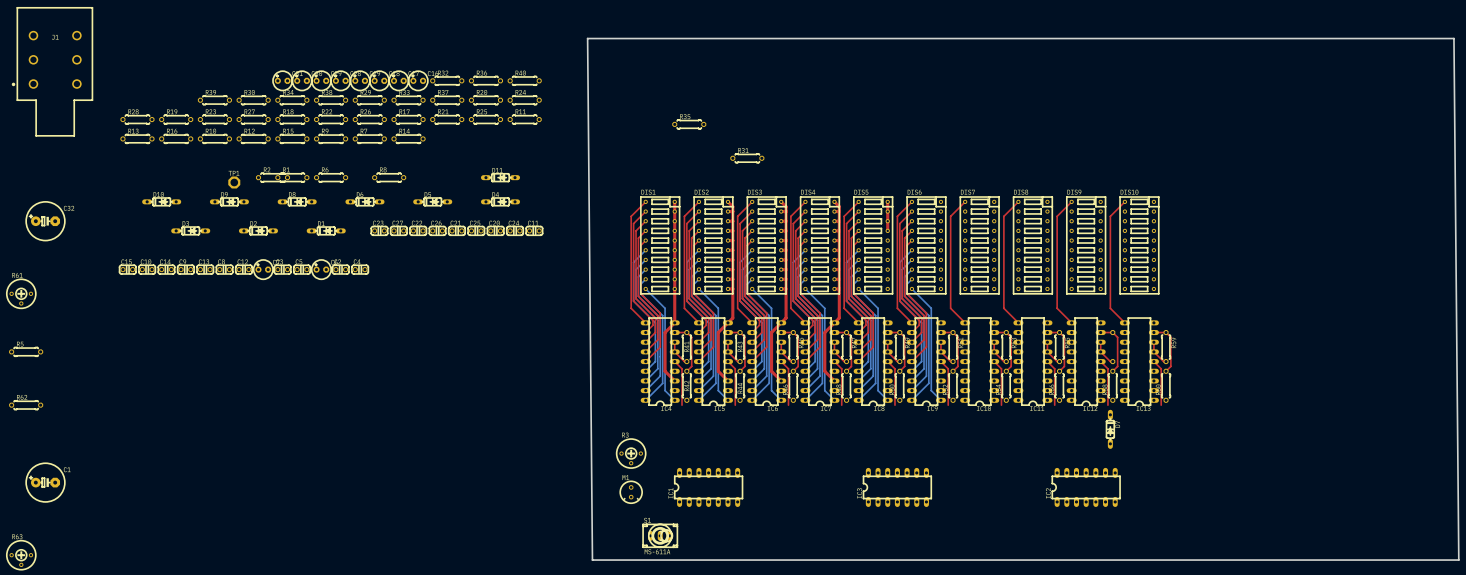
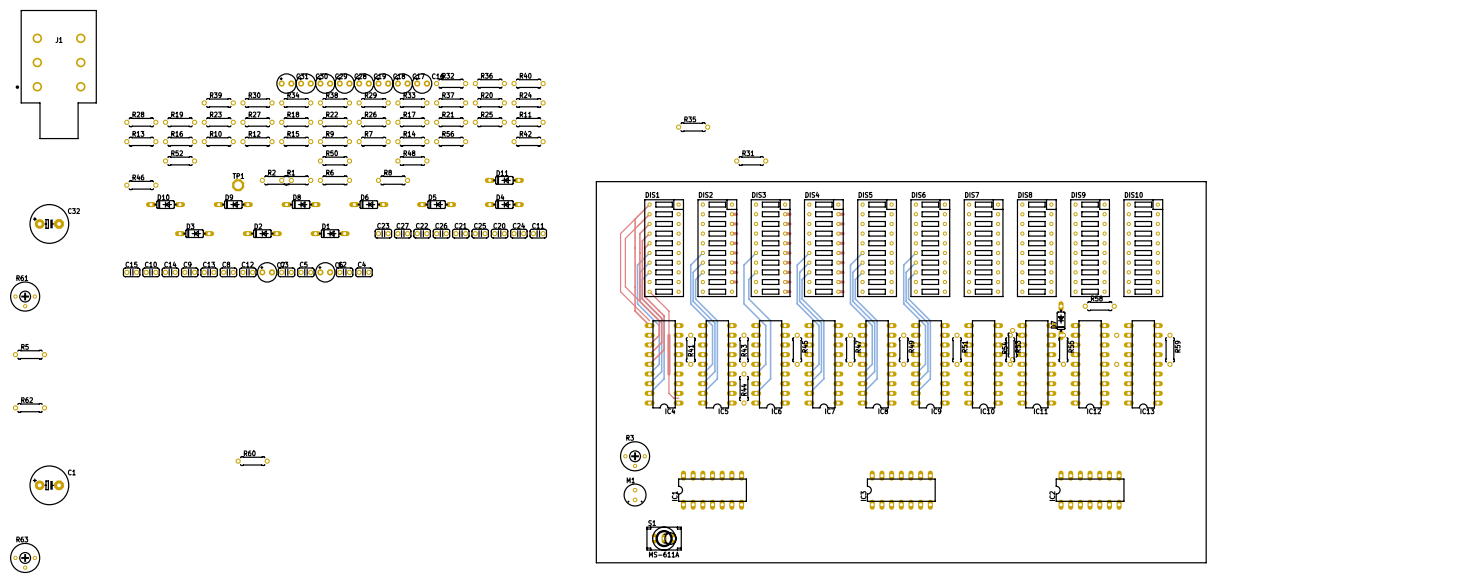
top track: (674, 201) (674, 322) (665, 332) -> (649, 291) (668, 311) (668, 335)
top track: (698, 201) (684, 216) (684, 308) (698, 322) -> none
top track: (727, 201) (732, 206) (732, 318) (718, 332) (718, 371) (727, 380) -> none
top track: (752, 201) (737, 216) (737, 308) (752, 322) -> none
top track: (781, 201) (786, 206) (786, 318) (771, 332) (771, 371) (781, 380) -> none
top track: (805, 201) (790, 216) (790, 308) (805, 322) -> none
top track: (834, 201) (839, 206) (839, 318) (824, 332) (824, 371) (834, 380) -> none
top track: (858, 201) (844, 216) (844, 308) (858, 322) -> none
top track: (887, 201) (887, 230) -> none
top track: (911, 201) (897, 216) (897, 308) (911, 322) -> none
top track: (965, 201) (950, 216) (950, 308) (965, 322) -> none
top track: (1018, 201) (1003, 216) (1003, 308) (1018, 322) -> none
top track: (1071, 201) (1057, 216) (1057, 308) (1071, 322) -> none
top track: (1124, 201) (1110, 216) (1110, 308) (1124, 322) -> none
top track: (698, 211) (686, 223) (686, 301) (706, 320) (706, 325) (698, 332) -> none
top track: (752, 211) (740, 223) (740, 301) (759, 320) (759, 325) (752, 332) -> none
top track: (805, 211) (793, 223) (793, 301) (812, 320) (812, 325) (805, 332) -> none
top track: (858, 211) (846, 223) (846, 301) (865, 320) (865, 325) (858, 332) -> none
top track: (911, 211) (899, 223) (899, 301) (919, 320) (919, 325) (911, 332) -> none
top track: none -> (635, 219) (620, 233) (620, 291) (649, 320)
top track: (698, 221) (689, 230) (689, 298) (708, 318) (708, 332) (698, 342) -> none
top track: (752, 221) (742, 230) (742, 298) (761, 318) (761, 332) (752, 342) -> none
top track: (805, 221) (795, 230) (795, 298) (815, 318) (815, 332) (805, 342) -> none
top track: (858, 221) (848, 230) (848, 298) (868, 318) (868, 332) (858, 342) -> none
top track: (911, 221) (902, 230) (902, 298) (921, 318) (921, 332) (911, 342) -> none
top track: (633, 223) (633, 301) (652, 320) (652, 325) (645, 332) -> (637, 226) (625, 238) (625, 286) (639, 301)
top track: (698, 230) (691, 238) (691, 296) (711, 315) (711, 339) (698, 351) -> none
top track: (752, 230) (744, 238) (744, 296) (764, 315) (764, 339) (752, 351) -> none
top track: (805, 230) (798, 238) (798, 296) (817, 315) (817, 339) (805, 351) -> none
top track: (858, 230) (851, 238) (851, 296) (870, 315) (870, 339) (858, 351) -> none
top track: (911, 230) (904, 238) (904, 296) (924, 315) (924, 339) (911, 351) -> none
top track: (698, 240) (694, 245) (694, 293) (713, 313) (713, 347) (698, 361) -> none
top track: (752, 240) (747, 245) (747, 293) (766, 313) (766, 347) (752, 361) -> none
top track: (805, 240) (800, 245) (800, 293) (819, 313) (819, 347) (805, 361) -> none
top track: (858, 240) (853, 245) (853, 293) (873, 313) (873, 347) (858, 361) -> none
top track: (911, 240) (907, 245) (907, 293) (926, 313) (926, 347) (911, 361) -> none
bottom track: (752, 259) (742, 269) (742, 298) (764, 320) (764, 368) (752, 380) -> none
bottom track: (645, 279) (640, 284) (640, 293) (662, 315) (662, 383) (645, 400) -> none
bottom track: (698, 279) (694, 284) (694, 293) (715, 315) (715, 383) (698, 400) -> none
bottom track: (752, 279) (747, 284) (747, 293) (769, 315) (769, 383) (752, 400) -> none
bottom track: (805, 279) (800, 284) (800, 293) (822, 315) (822, 383) (805, 400) -> none
bottom track: (858, 279) (853, 284) (853, 293) (875, 315) (875, 383) (858, 400) -> none
bottom track: (911, 279) (907, 284) (907, 293) (928, 315) (928, 383) (911, 400) -> none
bottom track: (645, 288) (665, 308) (665, 390) (674, 400) -> none
bottom track: (698, 288) (718, 308) (718, 390) (727, 400) -> none
top track: (727, 288) (732, 288) -> none
bottom track: (752, 288) (771, 308) (771, 390) (781, 400) -> none
bottom track: (805, 288) (824, 308) (824, 390) (834, 400) -> none
bottom track: (858, 288) (878, 308) (878, 390) (887, 400) -> none
bottom track: (911, 288) (931, 308) (931, 390) (940, 400) -> none
top track: (674, 332) (686, 332) (691, 337) (691, 366) (686, 371) -> none
top track: (727, 332) (740, 332) (744, 337) (744, 366) (740, 371) -> none
top track: (781, 332) (793, 332) (798, 337) (798, 366) (793, 371) -> none
top track: (834, 332) (846, 332) (851, 337) (851, 366) (846, 371) -> none
top track: (887, 332) (899, 332) (904, 337) (904, 366) (899, 371) -> none
top track: (940, 332) (953, 332) (957, 337) (957, 366) (953, 371) -> none
top track: (994, 332) (1006, 332) (1011, 337) (1011, 366) (1006, 371) -> none
top track: (1047, 332) (1059, 332) (1064, 337) (1064, 366) (1059, 371) -> none
top track: (1100, 332) (1112, 332) (1117, 337) (1117, 366) (1112, 371) -> none
top track: (1153, 332) (1166, 332) (1170, 337) (1170, 366) (1166, 371) -> none
top track: (674, 342) (674, 351) (684, 361) (686, 361) -> none
top track: (727, 342) (727, 351) (737, 361) (740, 361) -> none
top track: (781, 342) (781, 351) (790, 361) (793, 361) -> none
top track: (834, 342) (834, 351) (844, 361) (846, 361) -> none
top track: (887, 342) (887, 351) (897, 361) (899, 361) -> none
top track: (940, 342) (940, 351) (950, 361) (953, 361) -> none
top track: (994, 342) (994, 351) (1003, 361) (1006, 361) -> none
top track: (1047, 342) (1047, 351) (1057, 361) (1059, 361) -> none
top track: (1100, 342) (1100, 351) (1110, 361) (1112, 361) -> none
top track: (1153, 342) (1153, 351) (1163, 361) (1166, 361) -> none
top track: (674, 361) (682, 368) (682, 405) -> none
top track: (727, 361) (735, 368) (735, 405) -> none
top track: (781, 361) (788, 368) (788, 405) -> none
top track: (834, 361) (841, 368) (841, 405) -> none
top track: (887, 361) (894, 368) (894, 405) -> none
top track: (940, 361) (948, 368) (948, 405) -> none
top track: (994, 361) (1001, 368) (1001, 405) -> none
top track: (1047, 361) (1054, 368) (1054, 405) -> none
top track: (1100, 361) (1107, 368) (1107, 405) -> none
top track: (1153, 361) (1161, 368) (1161, 405) -> none
top track: (665, 371) (674, 380) -> (668, 374) (668, 393) (673, 398) (678, 398)
part rotation: 0° (686, 385) -> 90° clockwise (528, 141)
part position: (686, 385) -> (528, 141)
part rotation: 0° (793, 385) -> 90° clockwise (141, 185)
part position: (793, 385) -> (141, 185)
part rotation: 0° (846, 385) -> 90° clockwise (412, 161)
part position: (846, 385) -> (412, 161)
part rotation: 0° (899, 385) -> 90° clockwise (334, 161)
part position: (899, 385) -> (334, 161)
part rotation: 0° (953, 385) -> 90° clockwise (180, 161)
part position: (953, 385) -> (180, 161)
part position: (1006, 385) -> (1012, 344)
part rotation: 0° (1059, 385) -> 90° clockwise (451, 141)
part position: (1059, 385) -> (451, 141)
part rotation: 0° (1112, 385) -> 90° clockwise (1099, 306)
part position: (1112, 385) -> (1099, 306)
part rotation: 0° (1166, 385) -> 90° clockwise (252, 461)
part position: (1166, 385) -> (252, 461)
part rotation: 0° (1110, 429) -> 180° (1061, 320)
part position: (1110, 429) -> (1061, 320)
board edge: (592, 560) (587, 38) (1453, 38) (1458, 560) (1202, 560) -> (596, 562) (596, 181) (1206, 181) (1206, 562)

